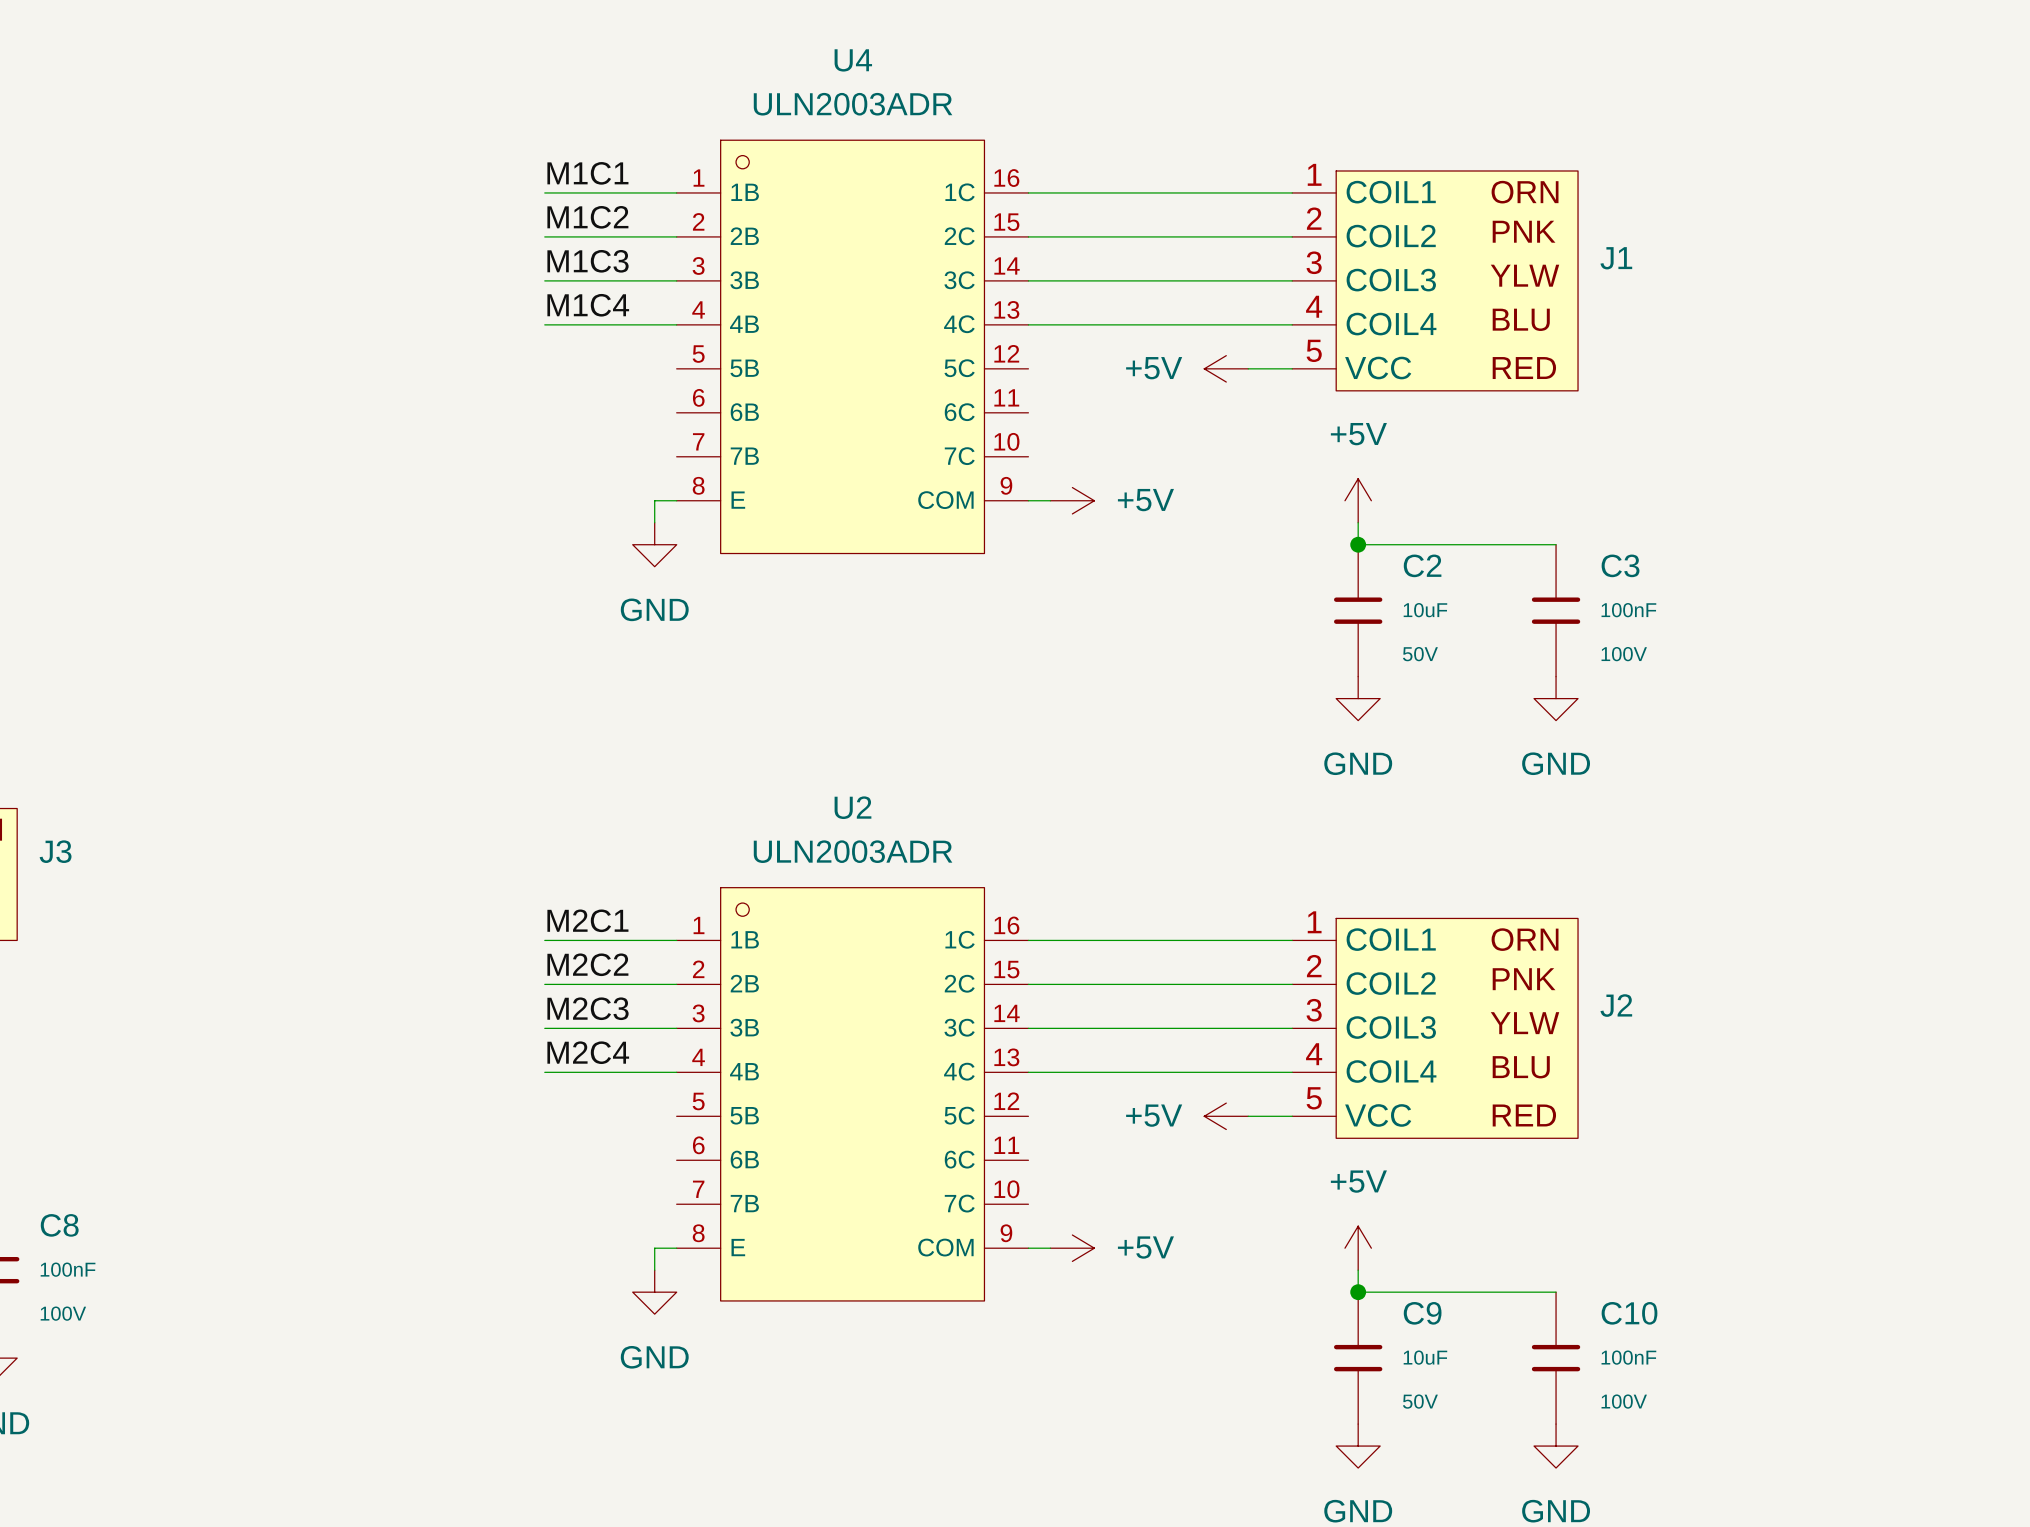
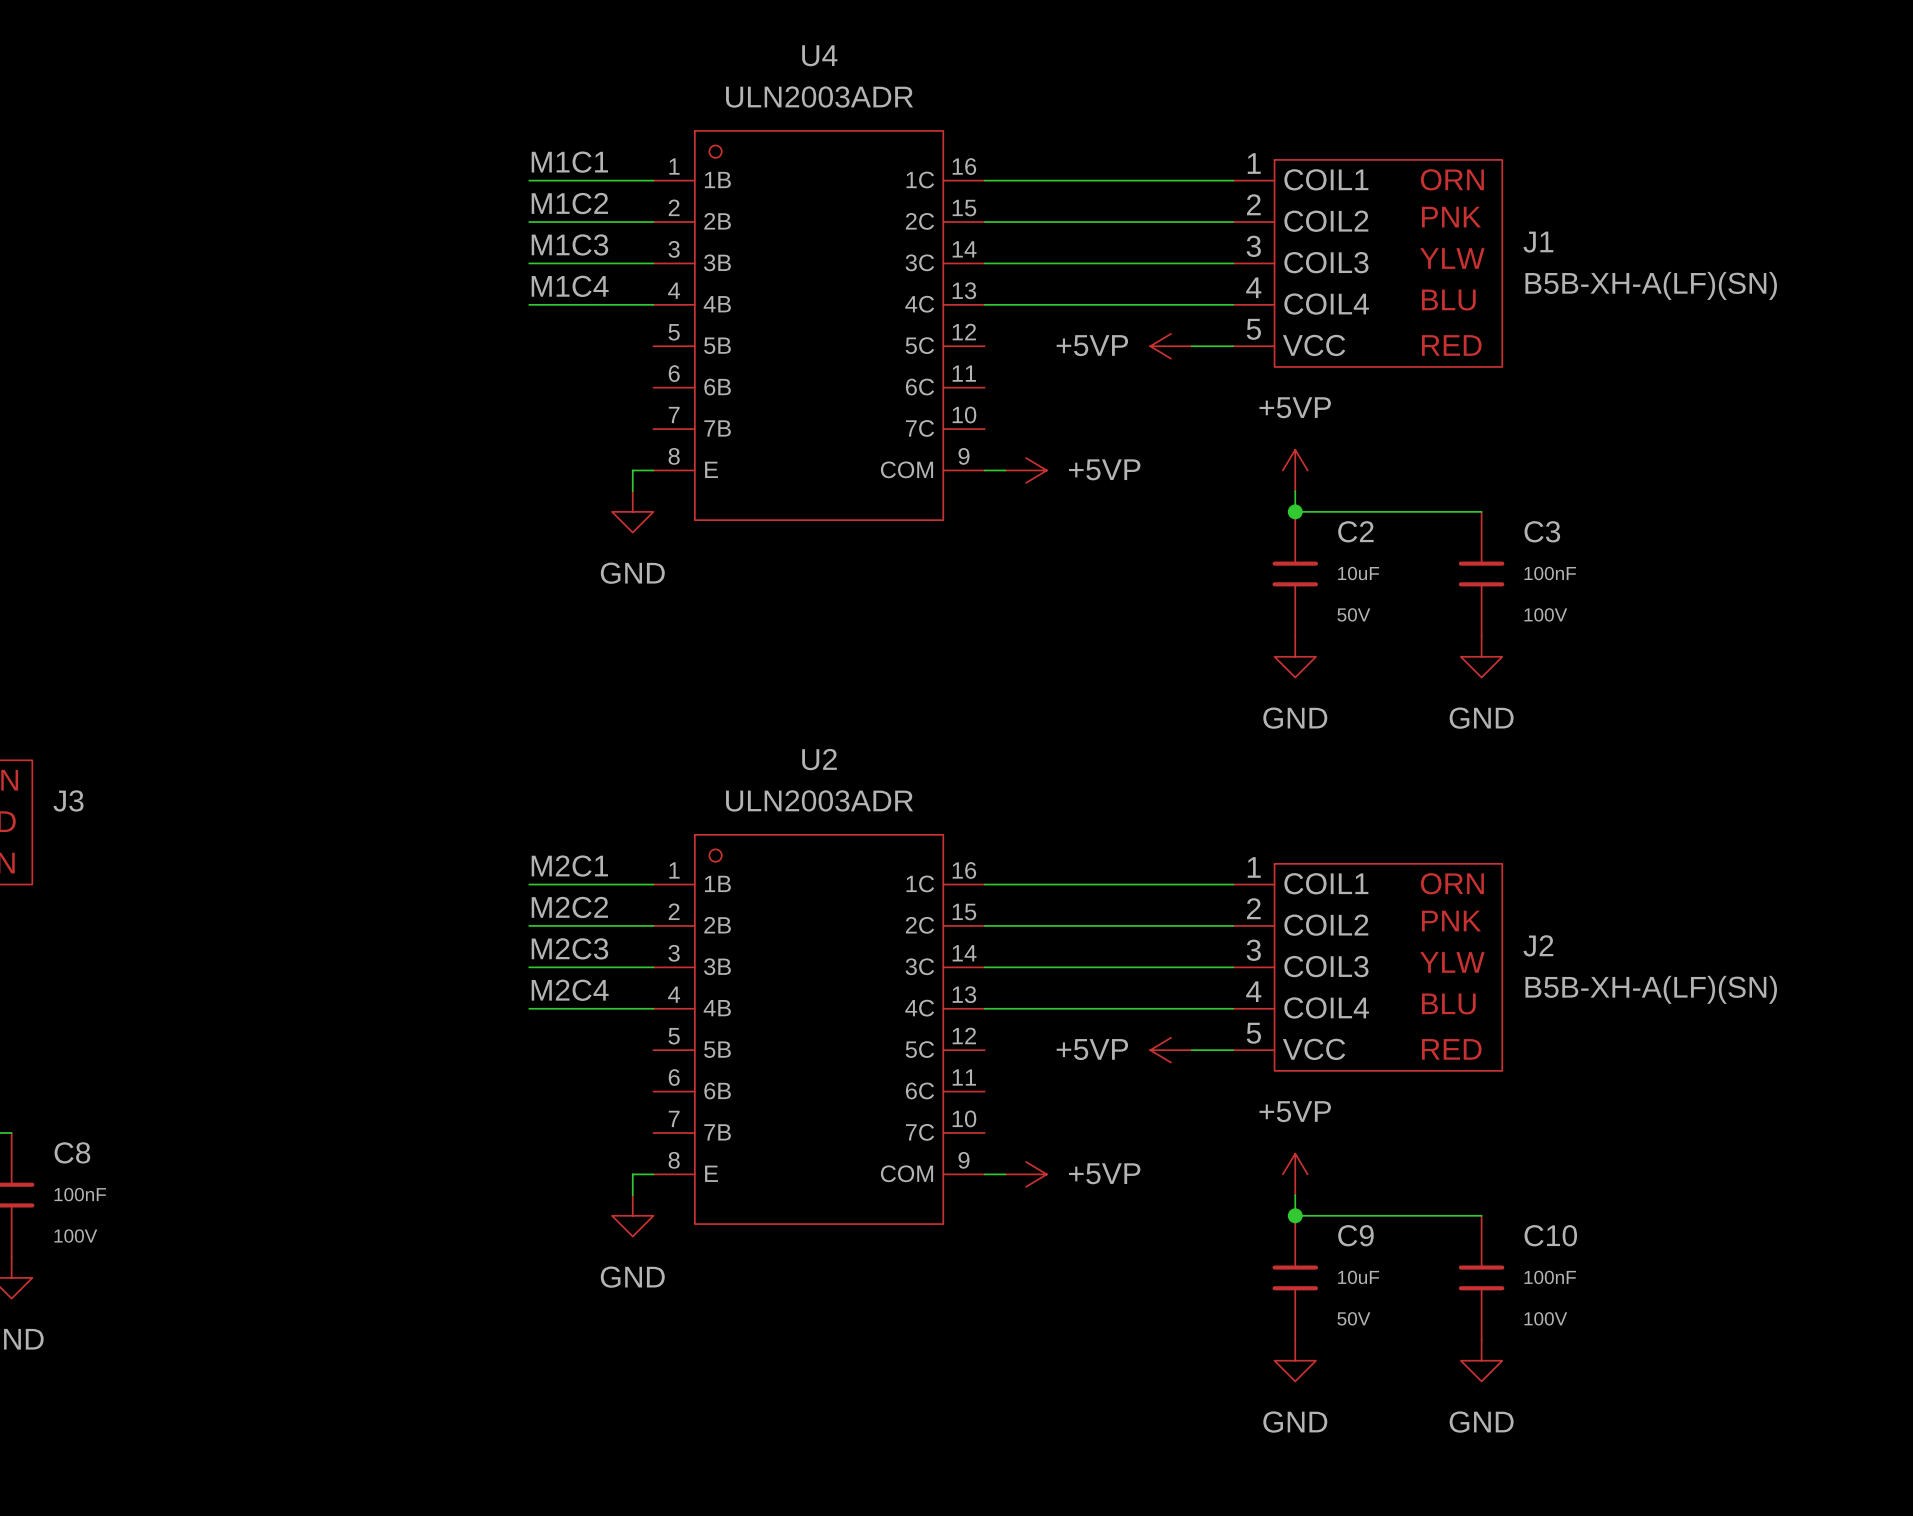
J1 value: none -> B5B-XH-A(LF)(SN) (1651, 285)
power symbol: +5V (1226, 368) -> +5VP (1171, 346)
power symbol: +5V (1072, 500) -> +5VP (1026, 470)
power symbol: +5V (1358, 500) -> +5VP (1295, 470)
J2 value: none -> B5B-XH-A(LF)(SN) (1651, 989)
power symbol: +5V (1226, 1116) -> +5VP (1171, 1050)
power symbol: +5V (1072, 1248) -> +5VP (1026, 1174)
power symbol: +5V (1358, 1248) -> +5VP (1295, 1174)

